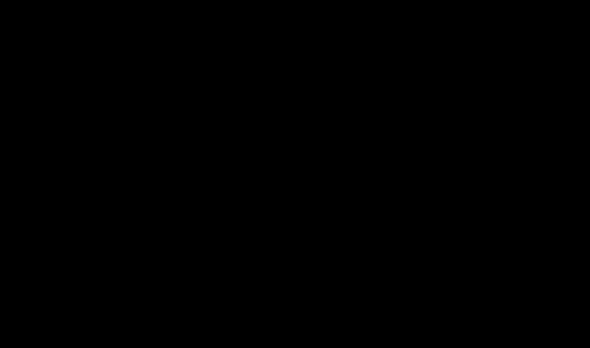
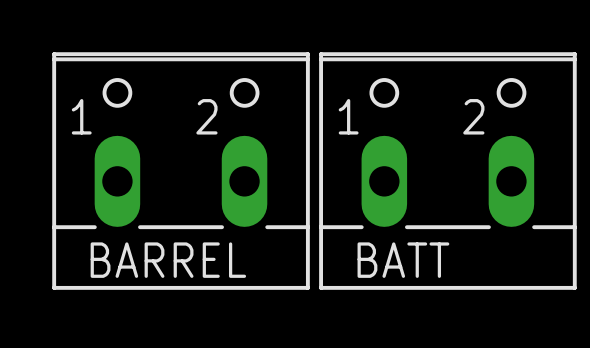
BARREL: none -> (181, 171)
BATT: none -> (447, 171)

